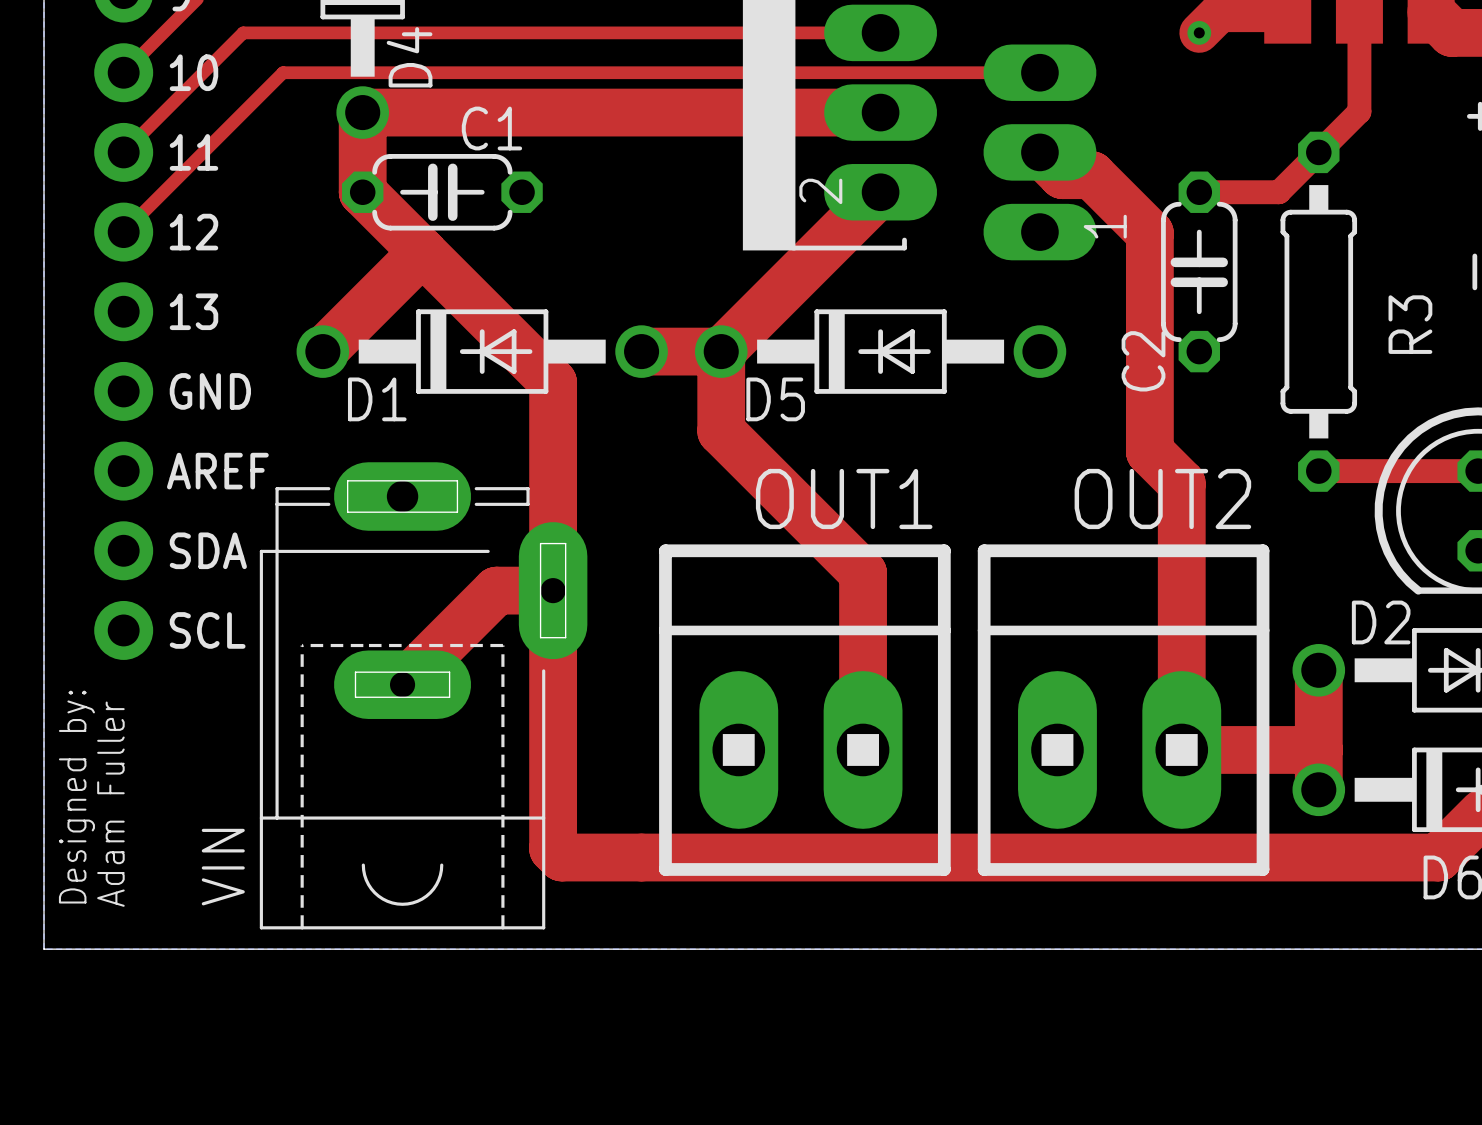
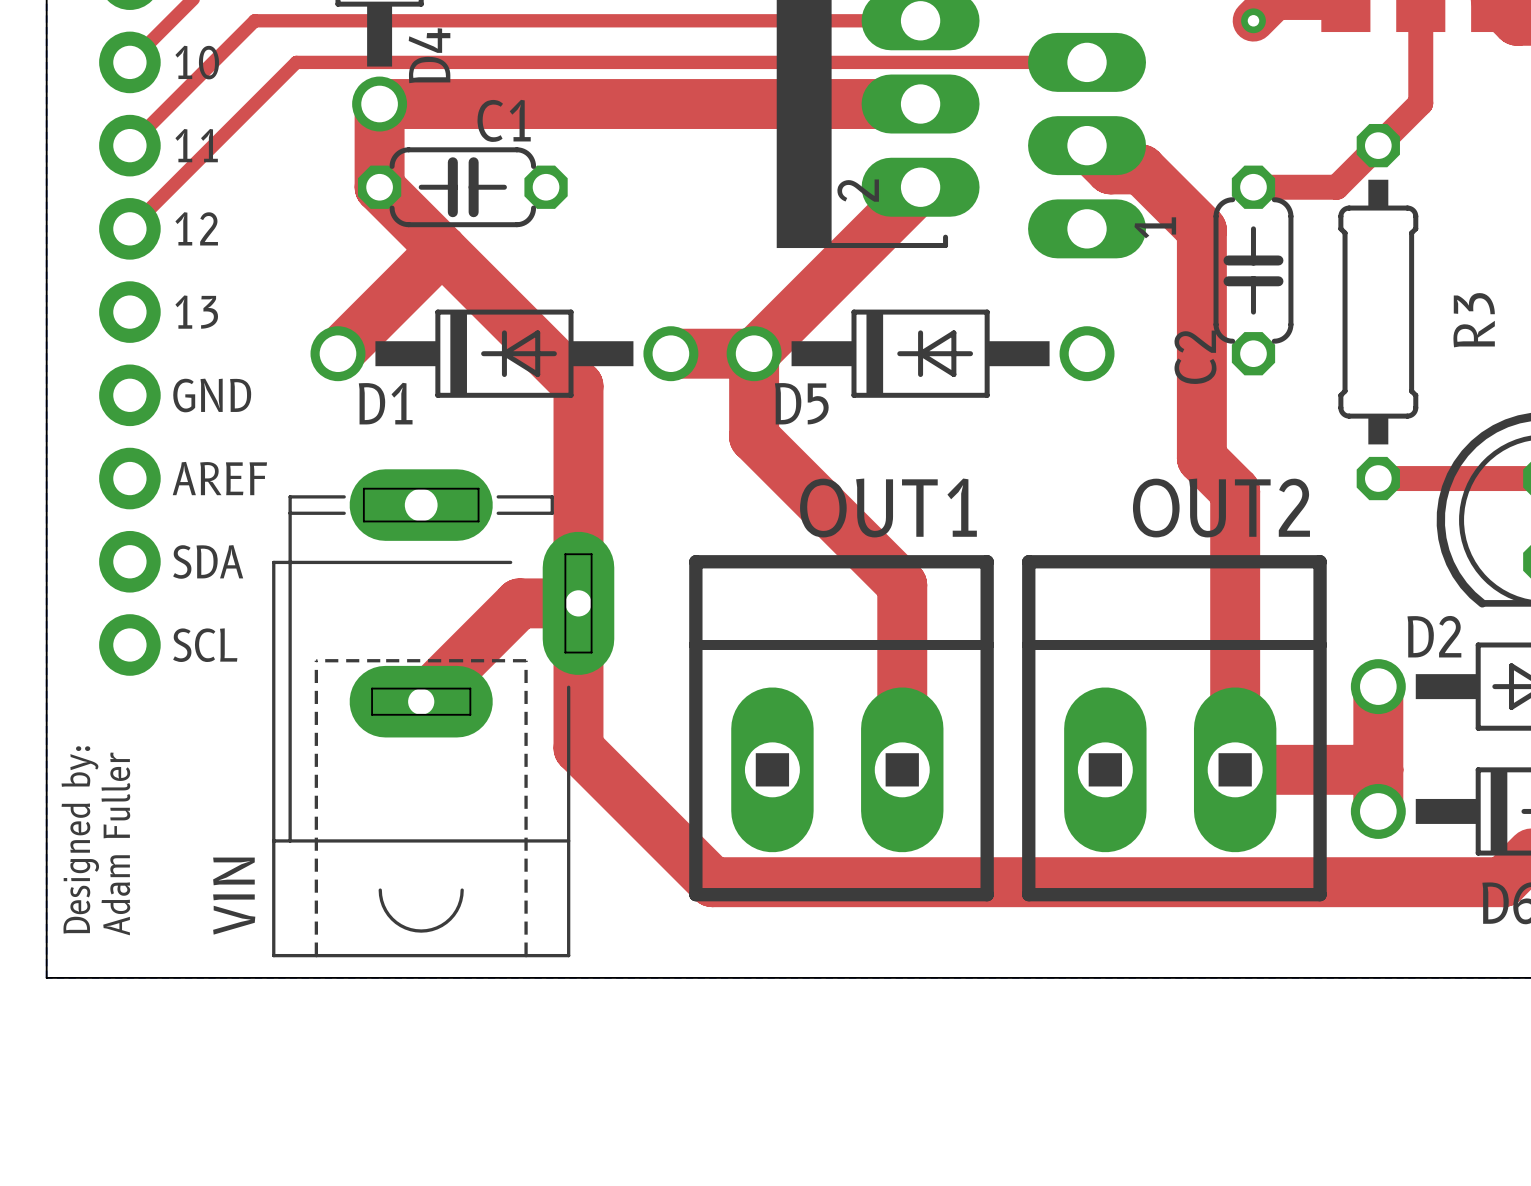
top track: (553, 729) (553, 848) (561, 857) (681, 857) -> (578, 748) (712, 882)

